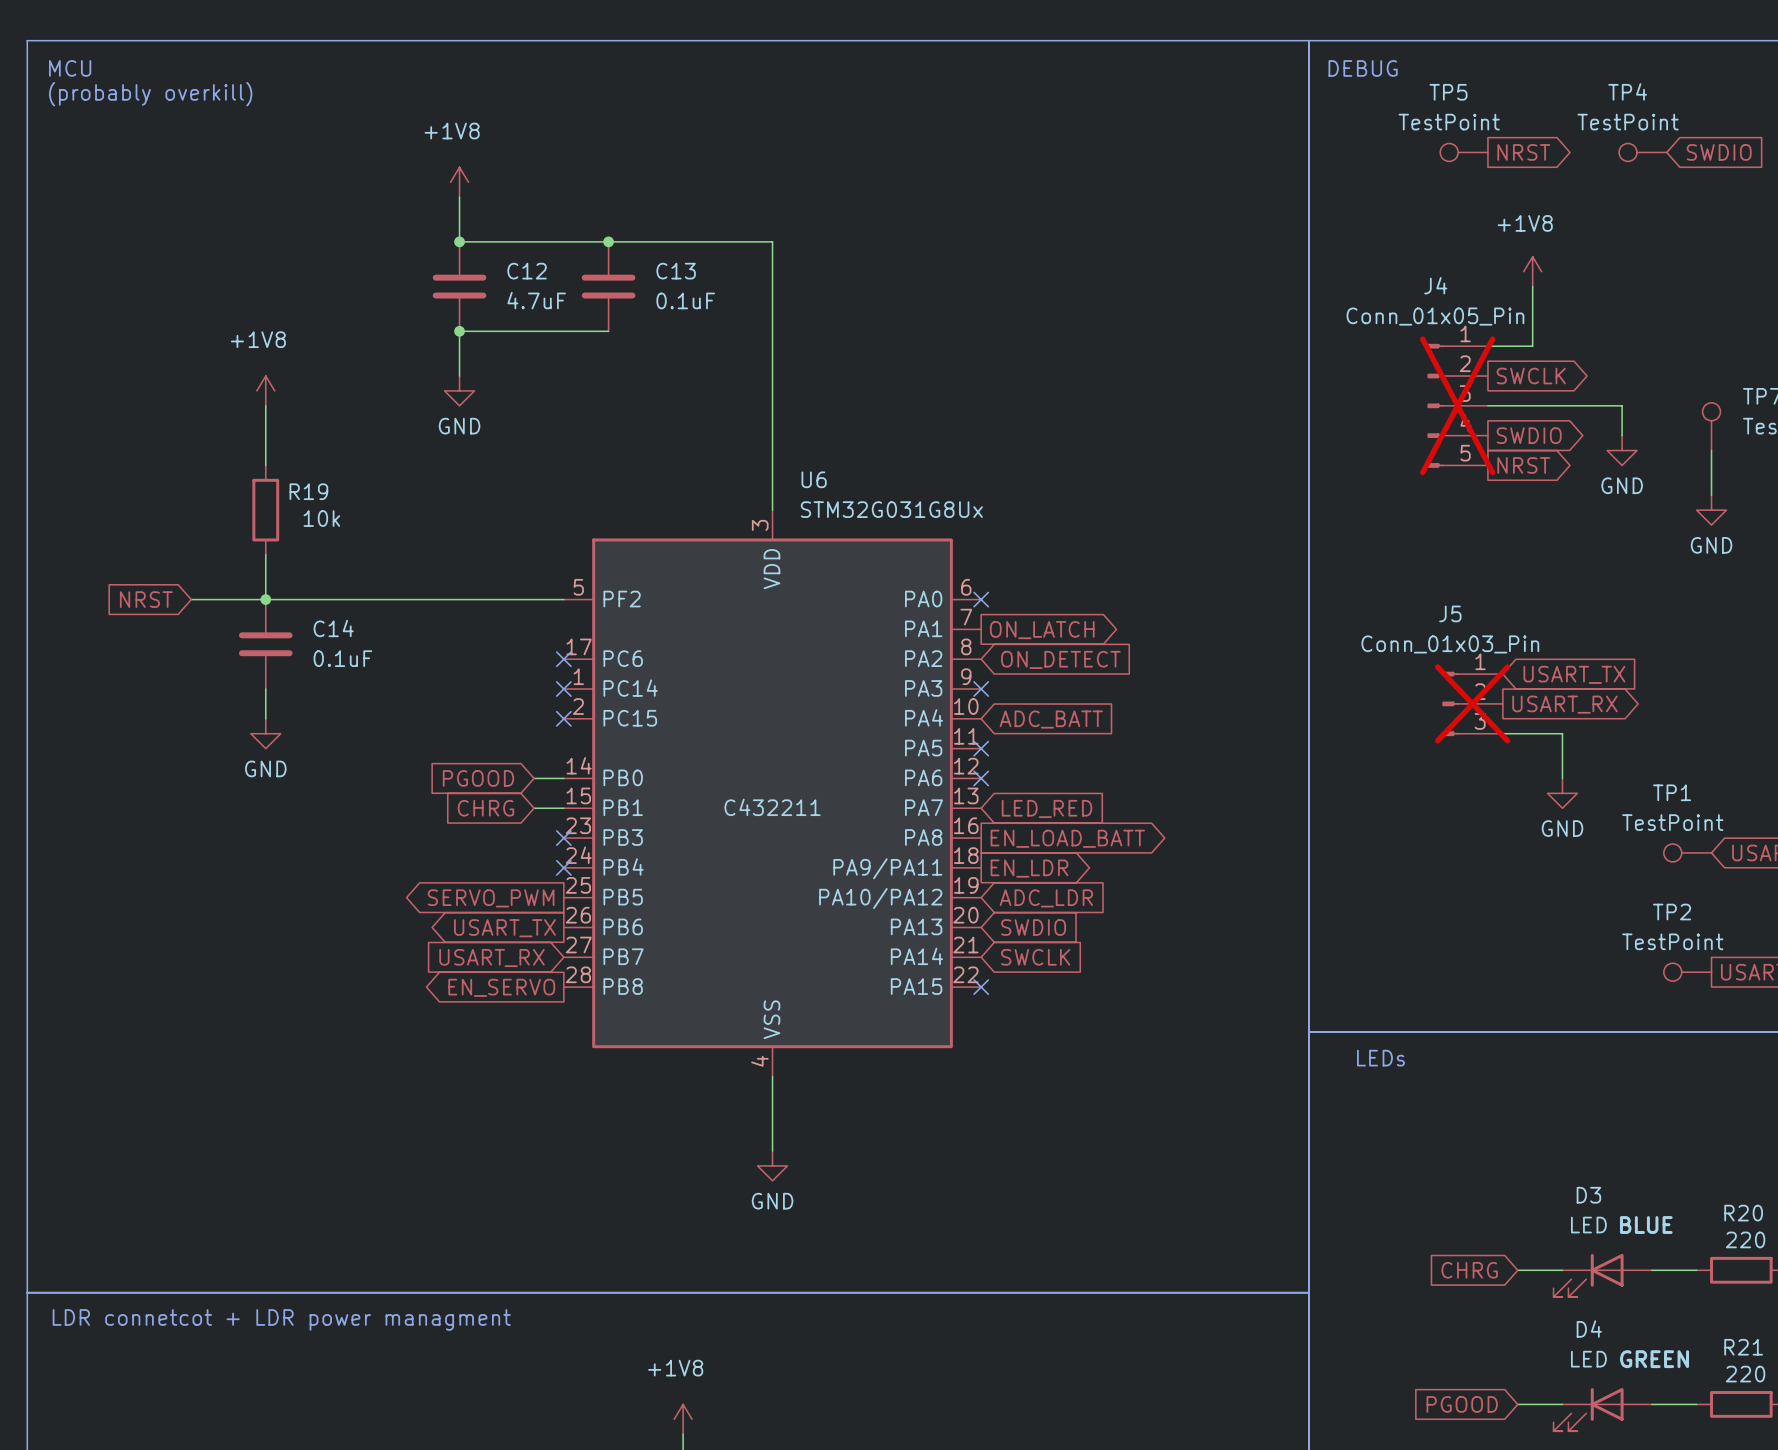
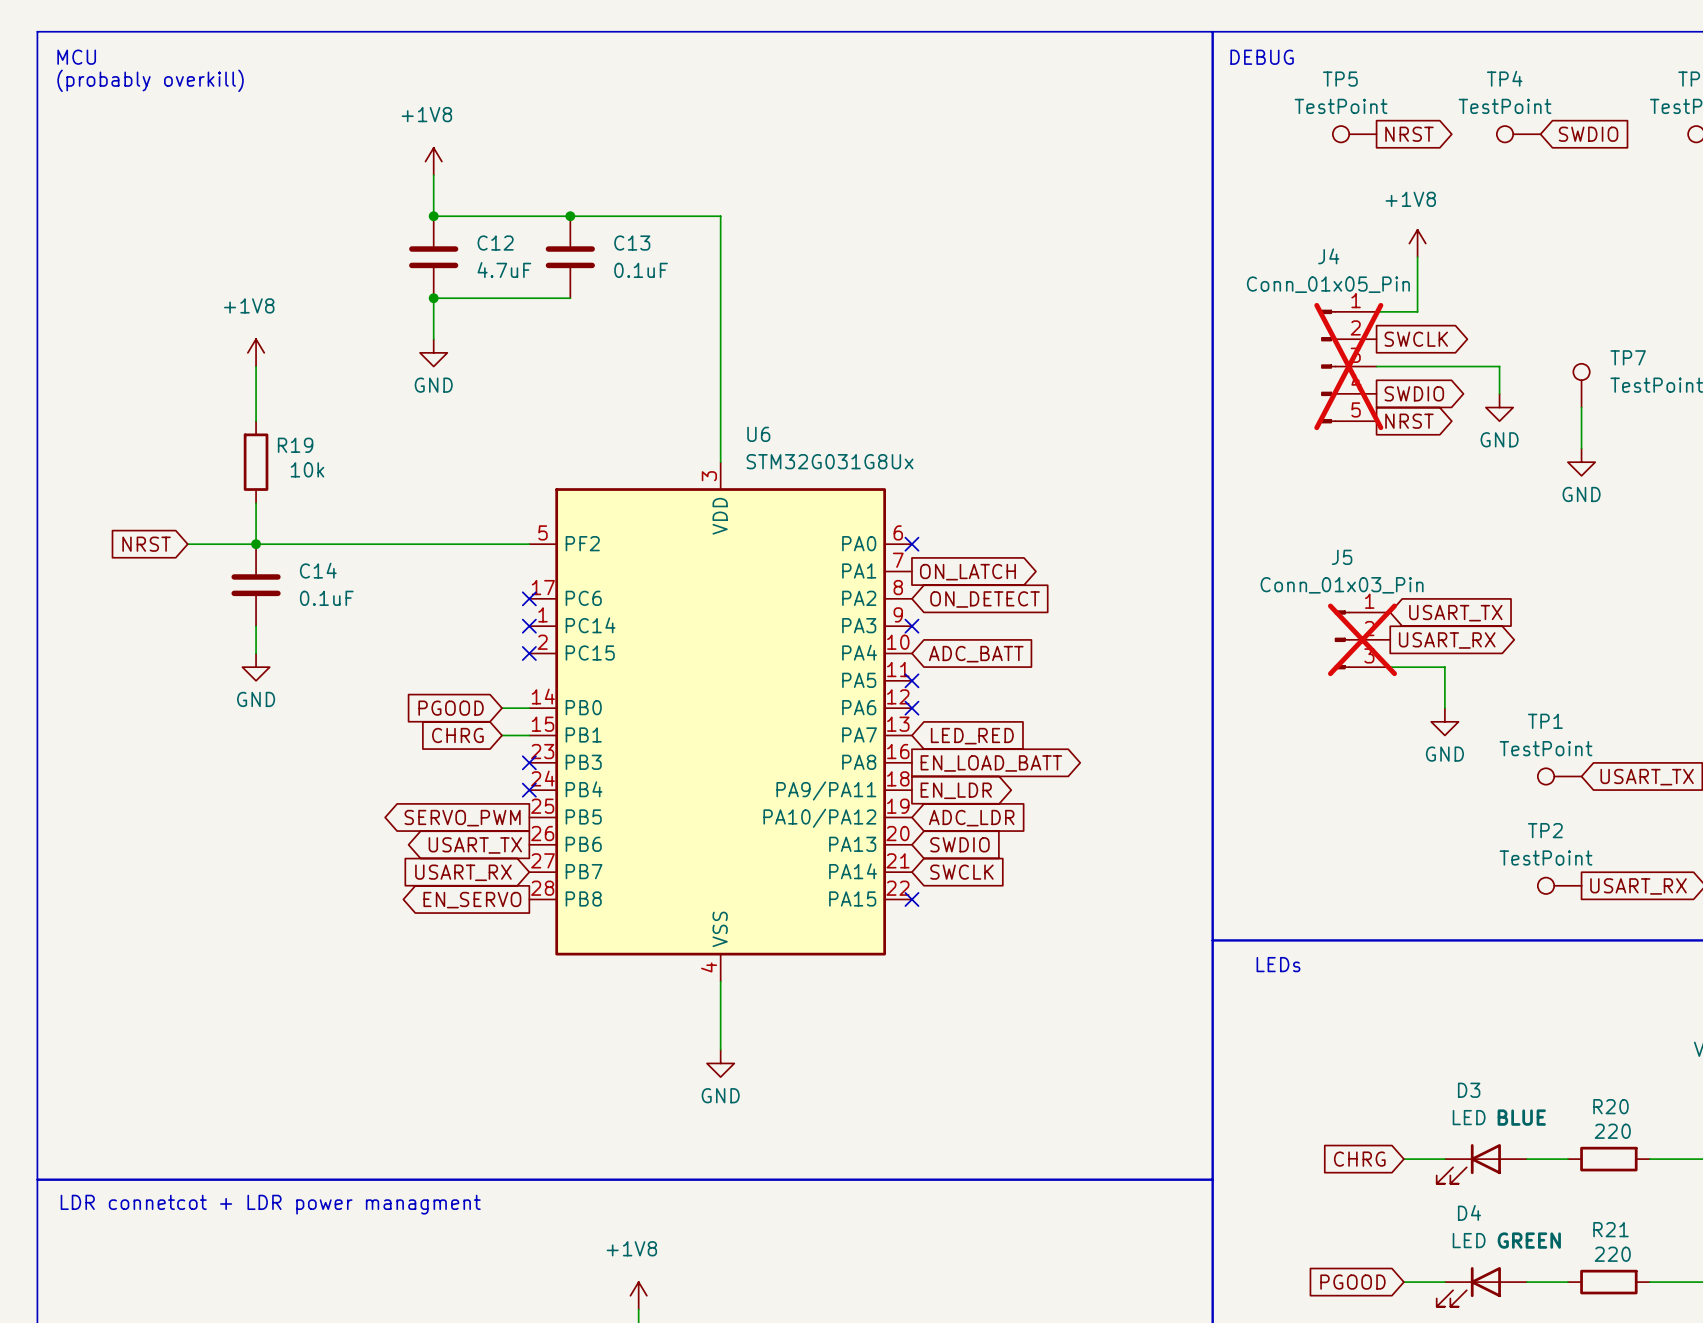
U6 text: C432211 (772, 807) -> none

